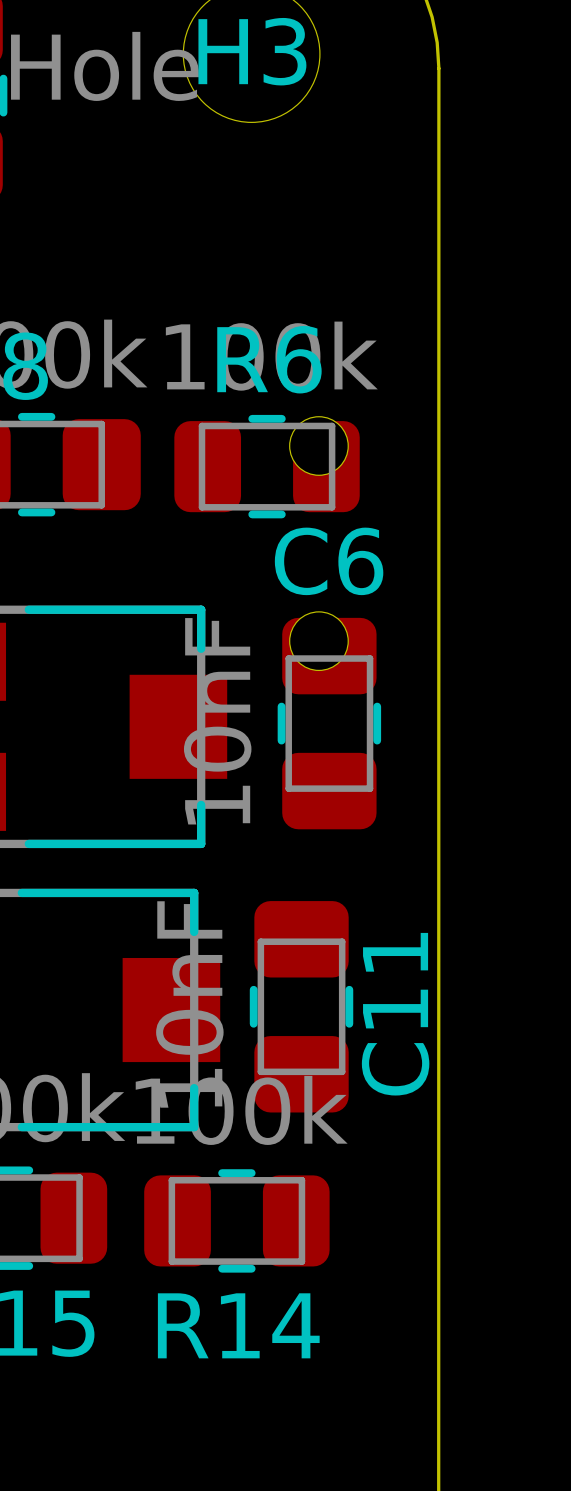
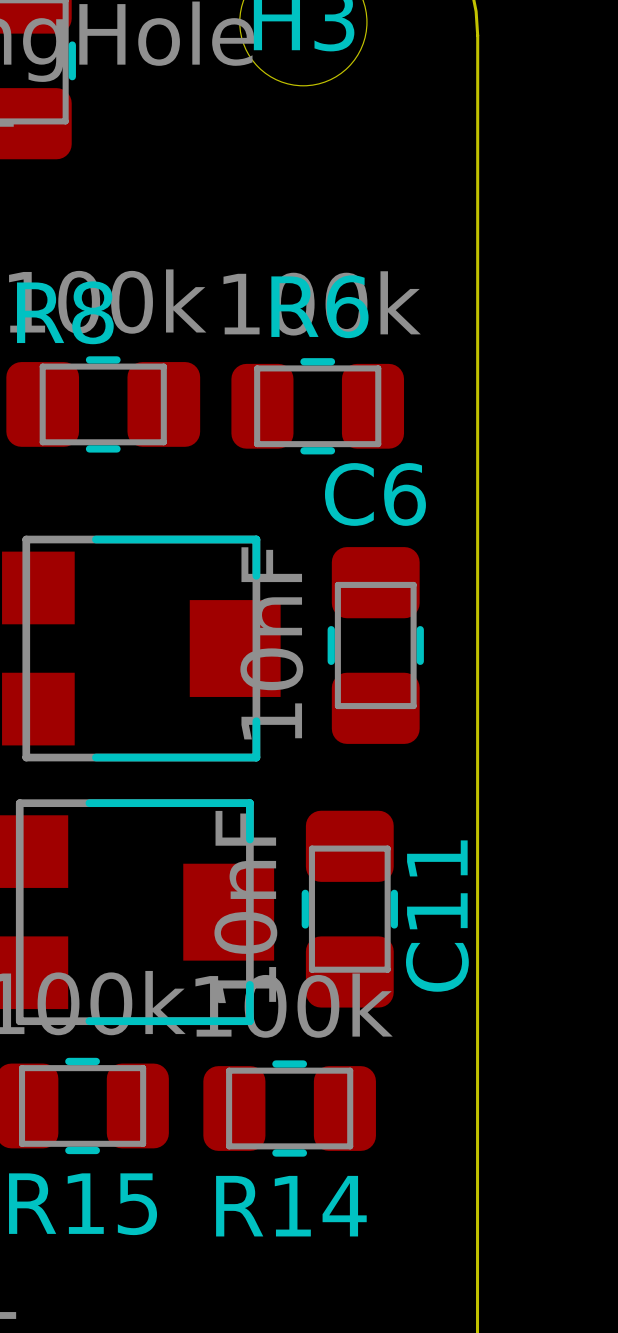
part: (318, 543) -> none

